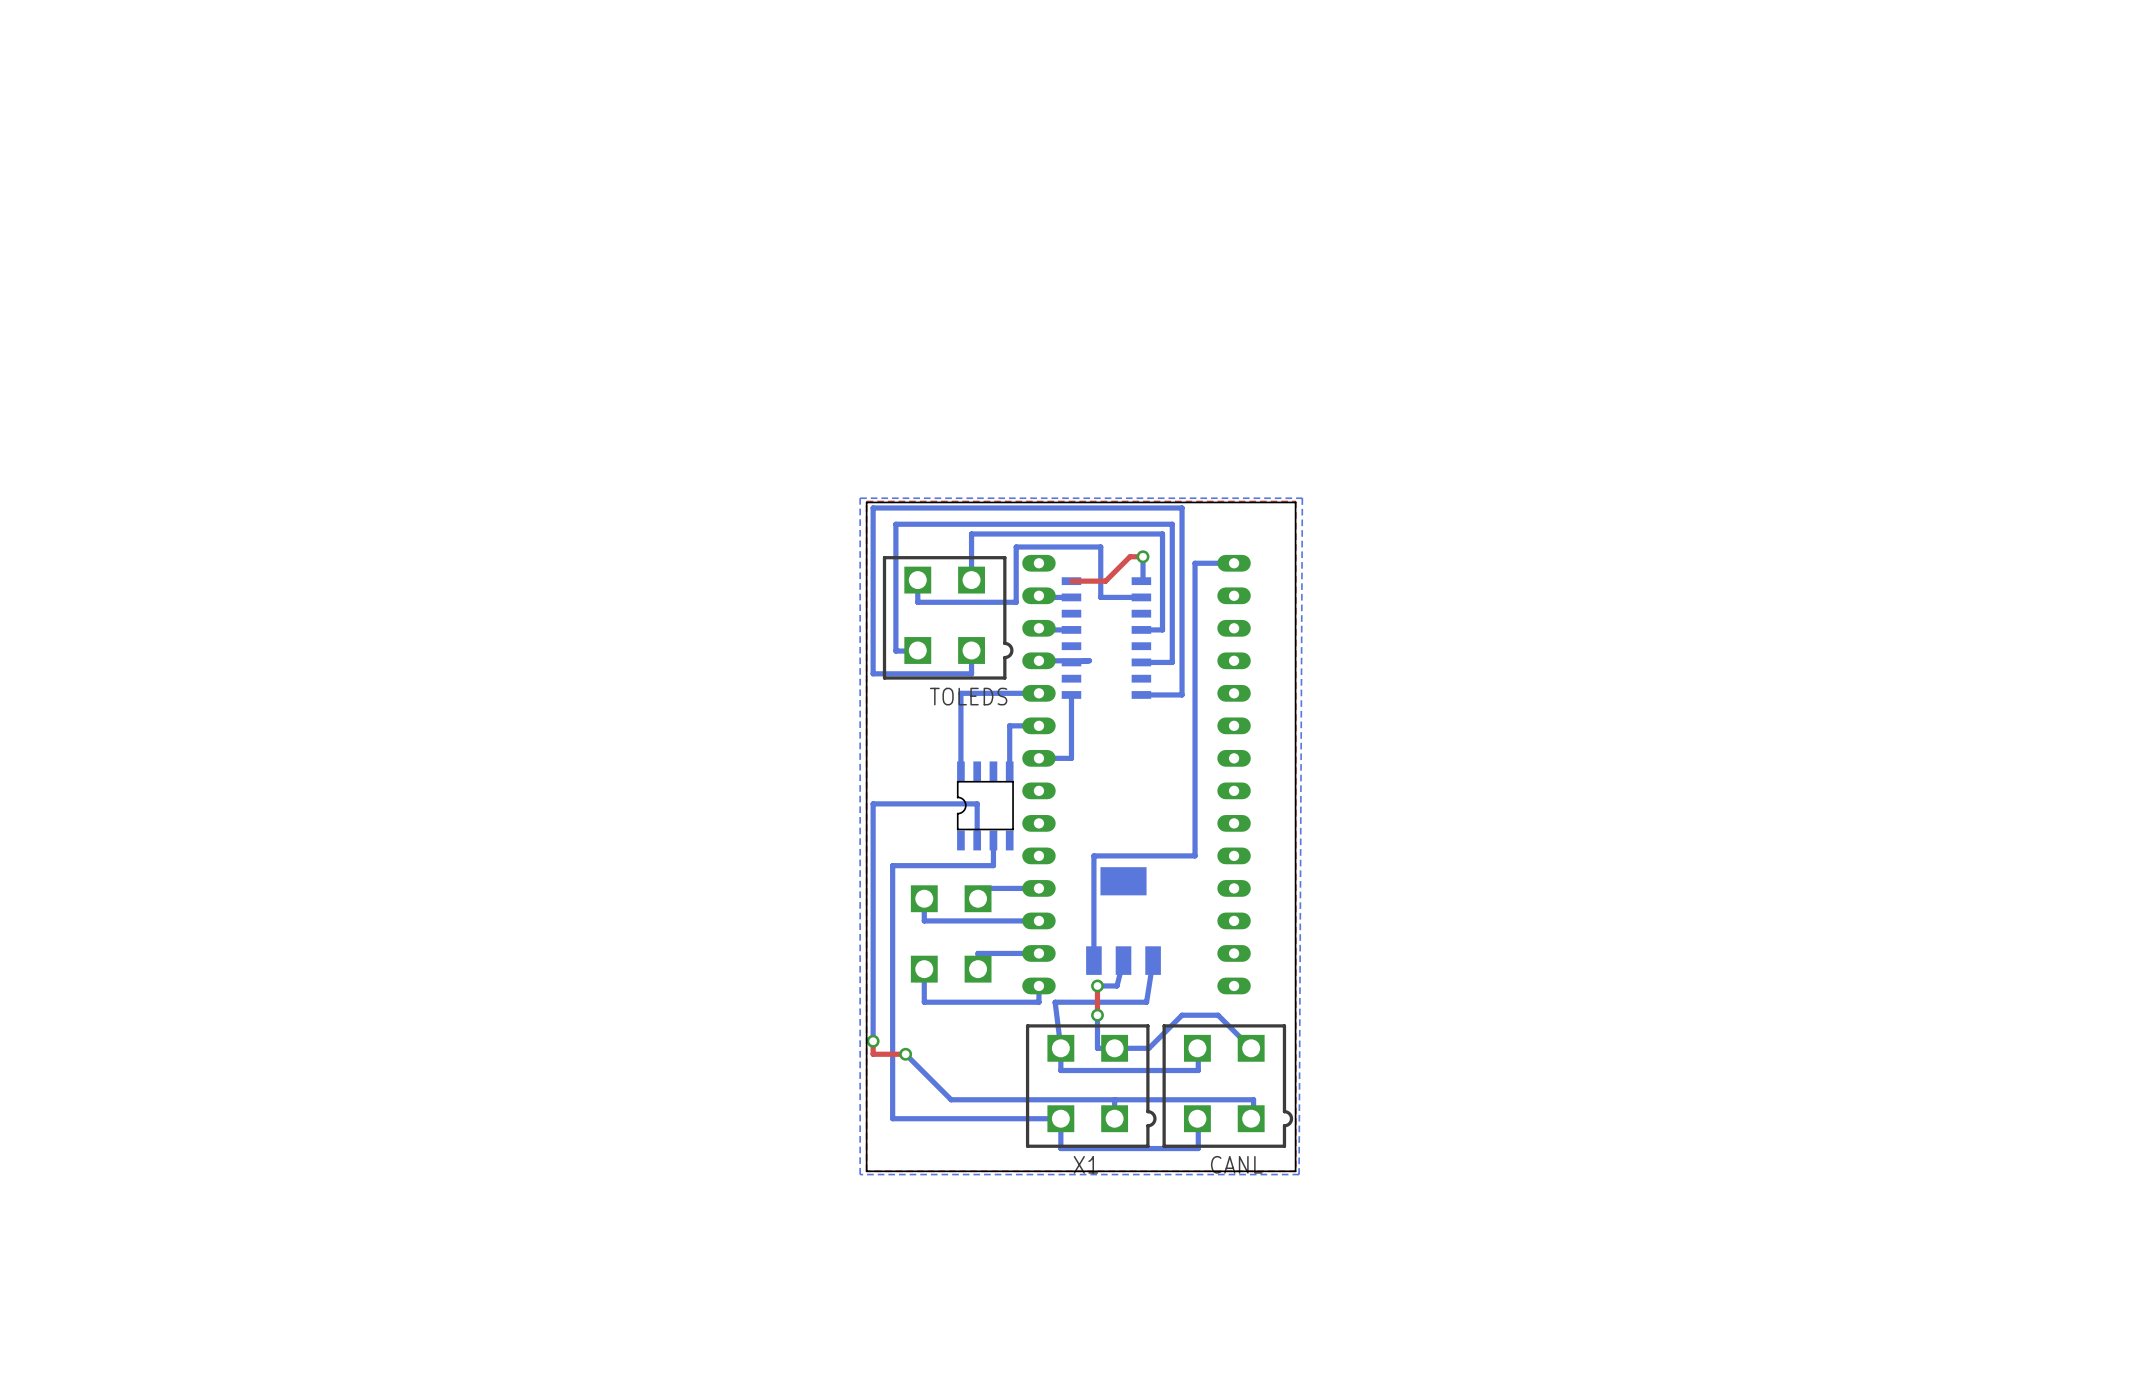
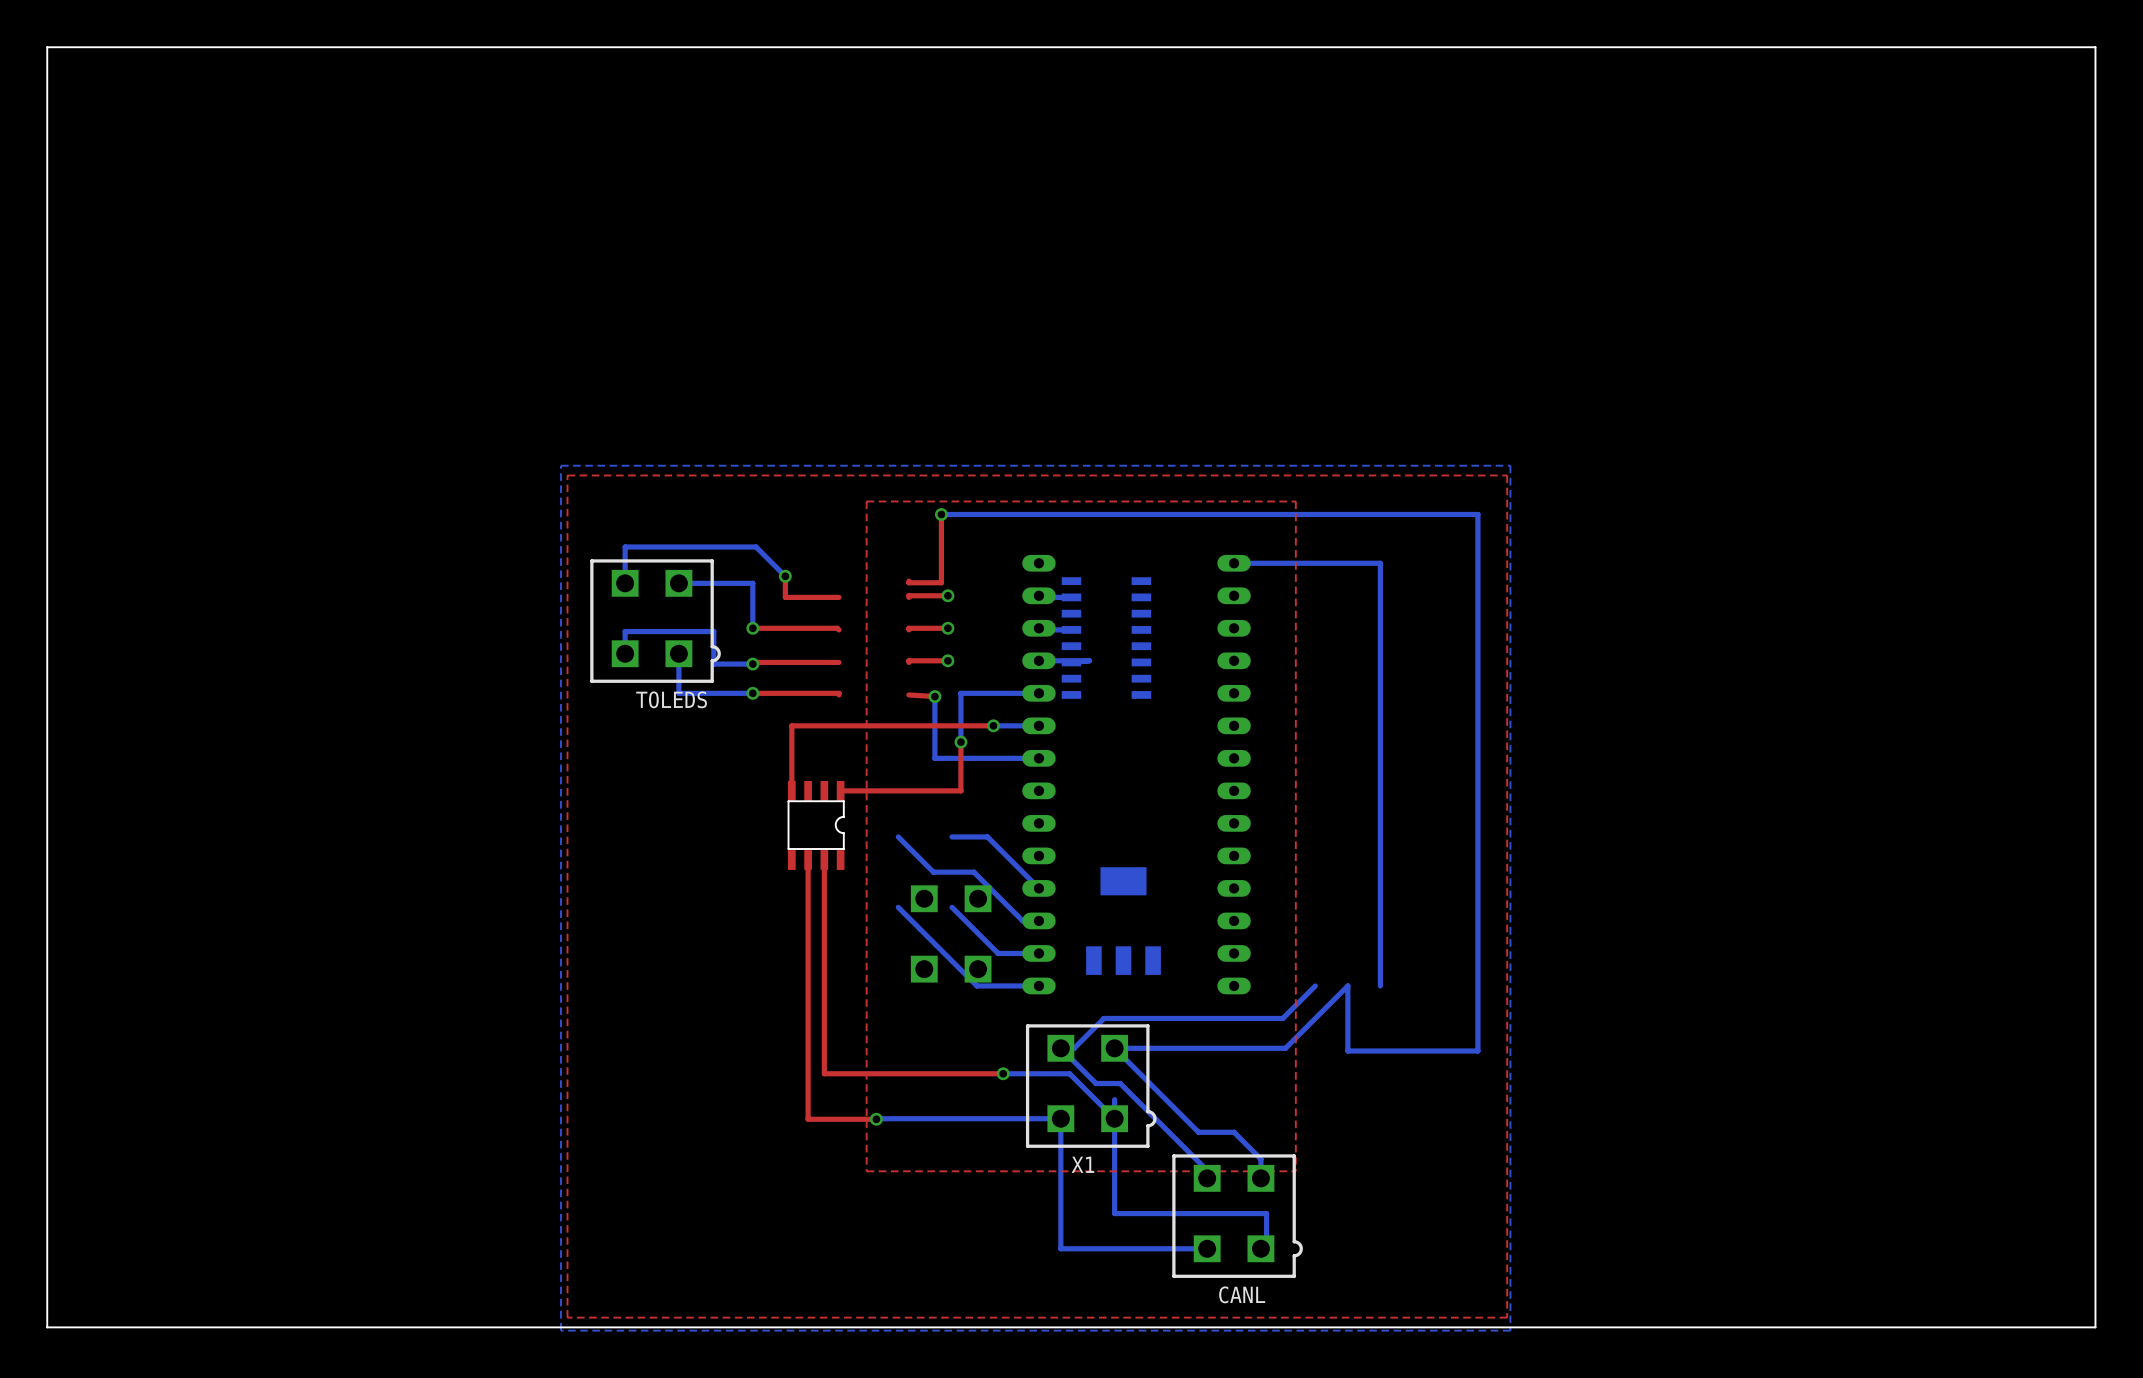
board edge: none -> (47, 47) (2095, 47) (2095, 1327) (47, 1327) (47, 47)
bottom zone outline: none -> (560, 465) (1510, 465) (1510, 1330) (560, 1330) (560, 465)
top zone outline: none -> (567, 475) (1507, 475) (1507, 1317) (567, 1317) (567, 475)
bottom zone outline: (860, 498) (1302, 498) (1299, 1174) (860, 1174) (860, 498) -> none
board edge: (866, 502) (1295, 502) (1295, 1171) (866, 1171) (866, 502) -> none
top track: none -> (941, 514) (941, 582) (908, 582) (908, 581)
via: none -> (941, 514)
bottom track: (1143, 556) (1143, 579) (1141, 581) -> none
top track: (1143, 556) (1130, 556) (1105, 581) (1071, 581) -> none
via: (1143, 556) -> none
bottom track: (1234, 563) (1195, 563) (1195, 855) (1093, 855) (1093, 960) -> (1234, 563) (1380, 563) (1380, 985)
bottom track: none -> (785, 576) (756, 547) (625, 547) (625, 583)
top track: none -> (785, 576) (785, 597) (838, 597)
via: none -> (785, 576)
bottom track: (917, 580) (917, 602) (1016, 602) (1016, 547) (1100, 547) (1100, 597) (1141, 597) -> none
bottom track: (971, 580) (971, 534) (1162, 534) (1162, 629) (1141, 629) -> none
bottom track: none -> (678, 583) (752, 583) (752, 628)
top track: none -> (947, 595) (908, 595) (908, 597)
via: none -> (947, 595)
TOLEDS position: (948, 617) -> (655, 621)
top track: none -> (752, 628) (837, 628) (838, 629)
via: none -> (752, 628)
top track: none -> (947, 628) (908, 628) (908, 629)
via: none -> (947, 628)
bottom track: (917, 650) (895, 651) (895, 524) (1172, 524) (1172, 662) (1141, 662) -> none
bottom track: (971, 650) (971, 673) (873, 673) (873, 507) (1182, 507) (1182, 694) (1141, 694) -> none
bottom track: none -> (625, 653) (625, 631) (713, 631) (713, 664) (752, 664)
bottom track: none -> (678, 653) (678, 693) (752, 693)
top track: none -> (947, 660) (908, 660) (908, 662)
via: none -> (947, 660)
top track: none -> (838, 662) (752, 662) (752, 664)
via: none -> (752, 664)
top track: none -> (752, 693) (838, 693) (838, 694)
via: none -> (752, 693)
top track: none -> (908, 694) (934, 696)
bottom track: (1071, 694) (1071, 758) (1038, 758) -> (934, 696) (934, 758) (1038, 758)
via: none -> (934, 696)
top track: none -> (993, 725) (791, 725) (791, 790)
via: none -> (993, 725)
bottom track: (1009, 725) (1009, 771) -> (1009, 725) (993, 725)
bottom track: (960, 742) (960, 771) -> none
top track: none -> (960, 742) (960, 790) (840, 790)
via: none -> (960, 742)
part side: bottom (985, 805) -> top (816, 825)
bottom track: (977, 840) (977, 803) (873, 803) (873, 1041) -> none
bottom track: (993, 840) (993, 865) (892, 865) (892, 1118) -> (876, 1119) (892, 1118)
top track: none -> (808, 860) (808, 1119) (876, 1119)
top track: none -> (824, 860) (824, 1073) (1003, 1073)
bottom track: (1038, 888) (978, 888) (978, 898) -> (1038, 888) (987, 836) (952, 836)
bottom track: (924, 898) (924, 920) (1022, 920) -> (898, 836) (933, 872) (973, 872) (1022, 920)
bottom track: (998, 953) (978, 953) (978, 969) -> (998, 953) (952, 907)
bottom track: (1123, 960) (1117, 985) (1097, 985) -> none
bottom track: (1153, 960) (1146, 1002) (1055, 1002) (1060, 1048) (1060, 1070) (1198, 1070) (1198, 1048) -> (941, 514) (1477, 514) (1477, 1051) (1347, 1051) (1347, 985) (1285, 1048) (1198, 1048)
bottom track: (924, 969) (924, 1002) (1038, 1002) (1038, 985) -> (898, 907) (976, 985) (1038, 985)
top track: (1097, 985) (1097, 1015) -> none
via: (1097, 985) -> none
bottom track: none -> (1315, 985) (1282, 1018) (1103, 1018) (1074, 1048) (1060, 1048) (1096, 1083) (1120, 1083) (1207, 1170) (1207, 1178)
bottom track: (1097, 1015) (1097, 1048) (1114, 1048) -> (1260, 1178) (1260, 1159) (1234, 1132) (1198, 1132) (1114, 1048)
via: (1097, 1015) -> none
top track: (873, 1041) (873, 1054) (905, 1054) -> none
via: (873, 1041) -> none
bottom track: (1148, 1048) (1182, 1015) (1218, 1015) (1251, 1048) -> (1148, 1048) (1197, 1048)
bottom track: (905, 1054) (951, 1099) (1253, 1099) (1253, 1118) (1251, 1118) -> none
via: (905, 1054) -> none
bottom track: none -> (1003, 1073) (1069, 1073) (1114, 1118) (1114, 1213) (1266, 1213) (1266, 1248) (1260, 1248)
via: none -> (1003, 1073)
CANL position: (1227, 1086) -> (1237, 1216)
bottom track: (1197, 1118) (1198, 1148) (1060, 1148) -> (1207, 1248) (1060, 1248) (1060, 1148)
via: none -> (876, 1119)

